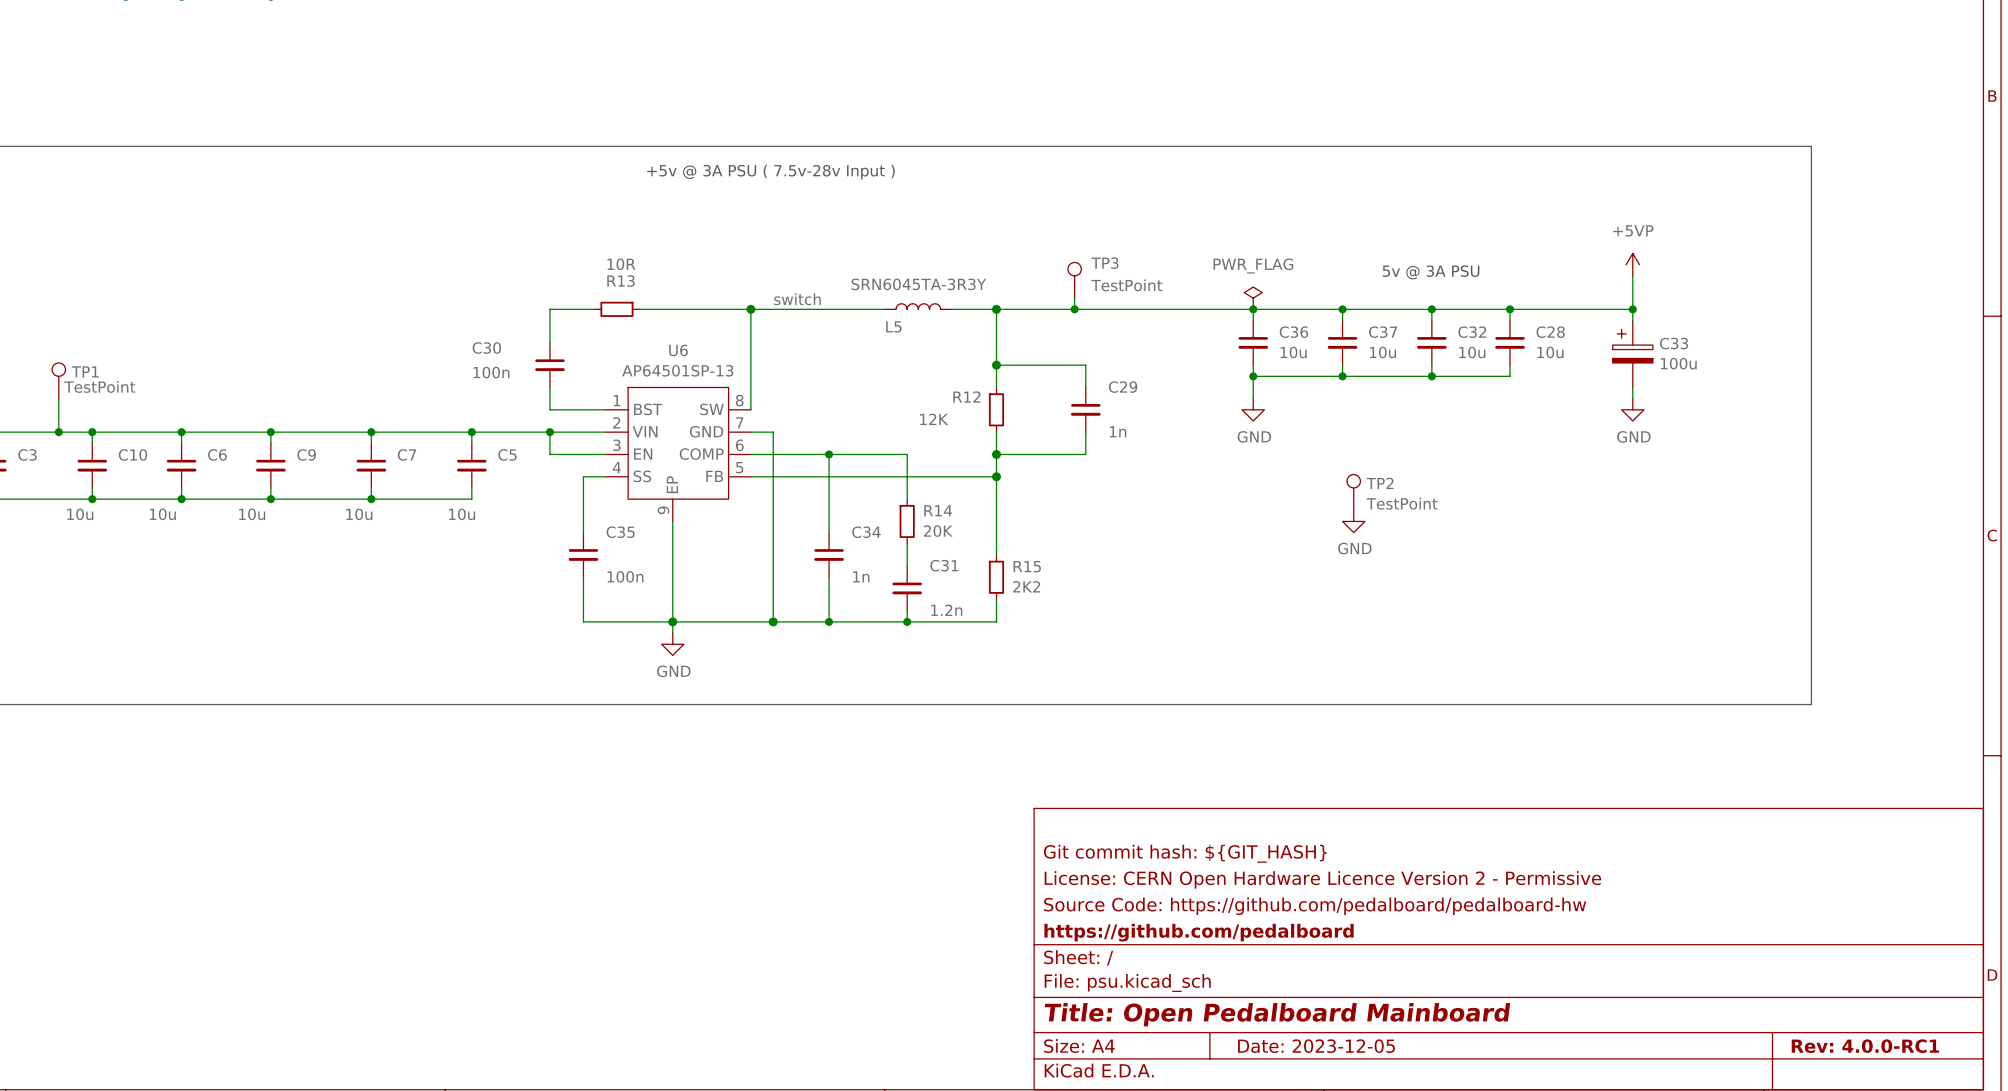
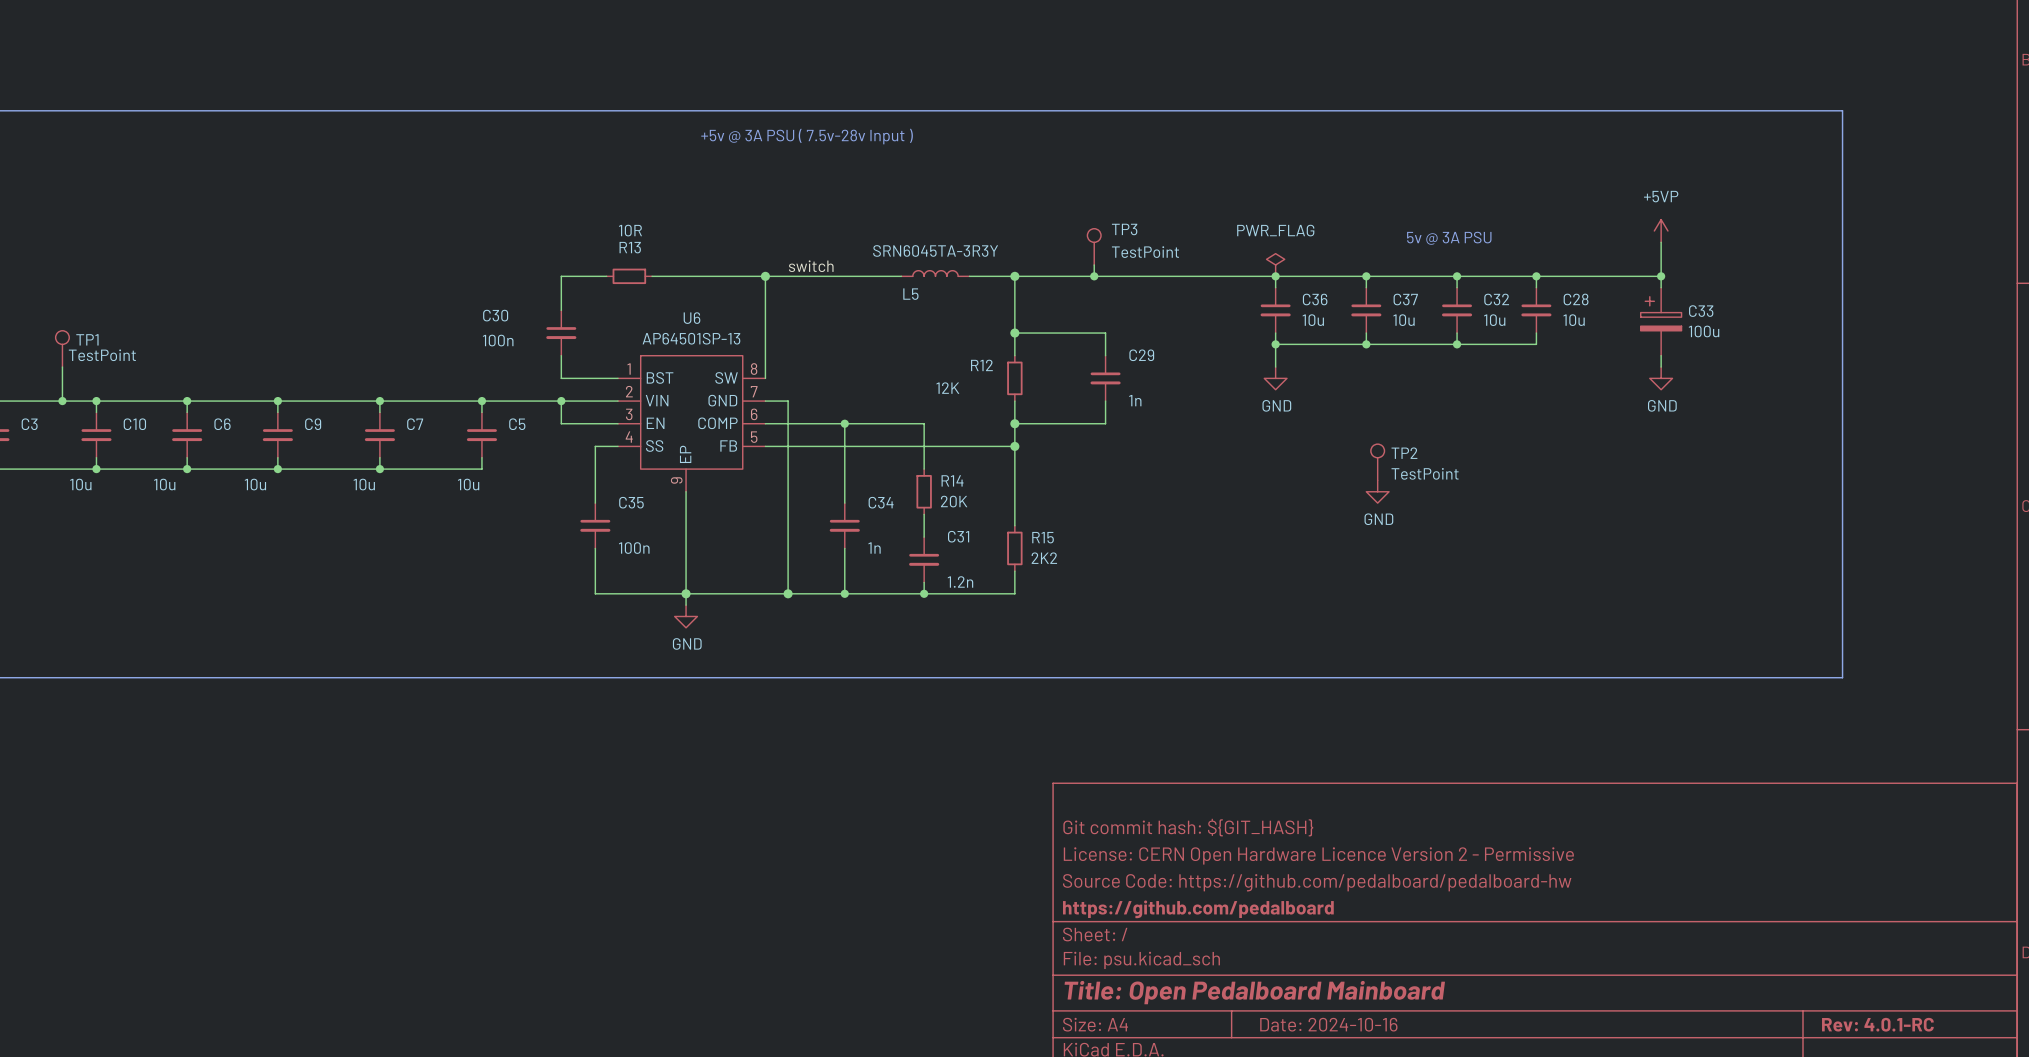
title block: Date: 2023-12-05 (1316, 1046) -> Date: 2024-10-16 (1328, 1024)
title block: Rev: 4.0.0-RC1 (1865, 1046) -> Rev: 4.0.1-RC (1877, 1024)

